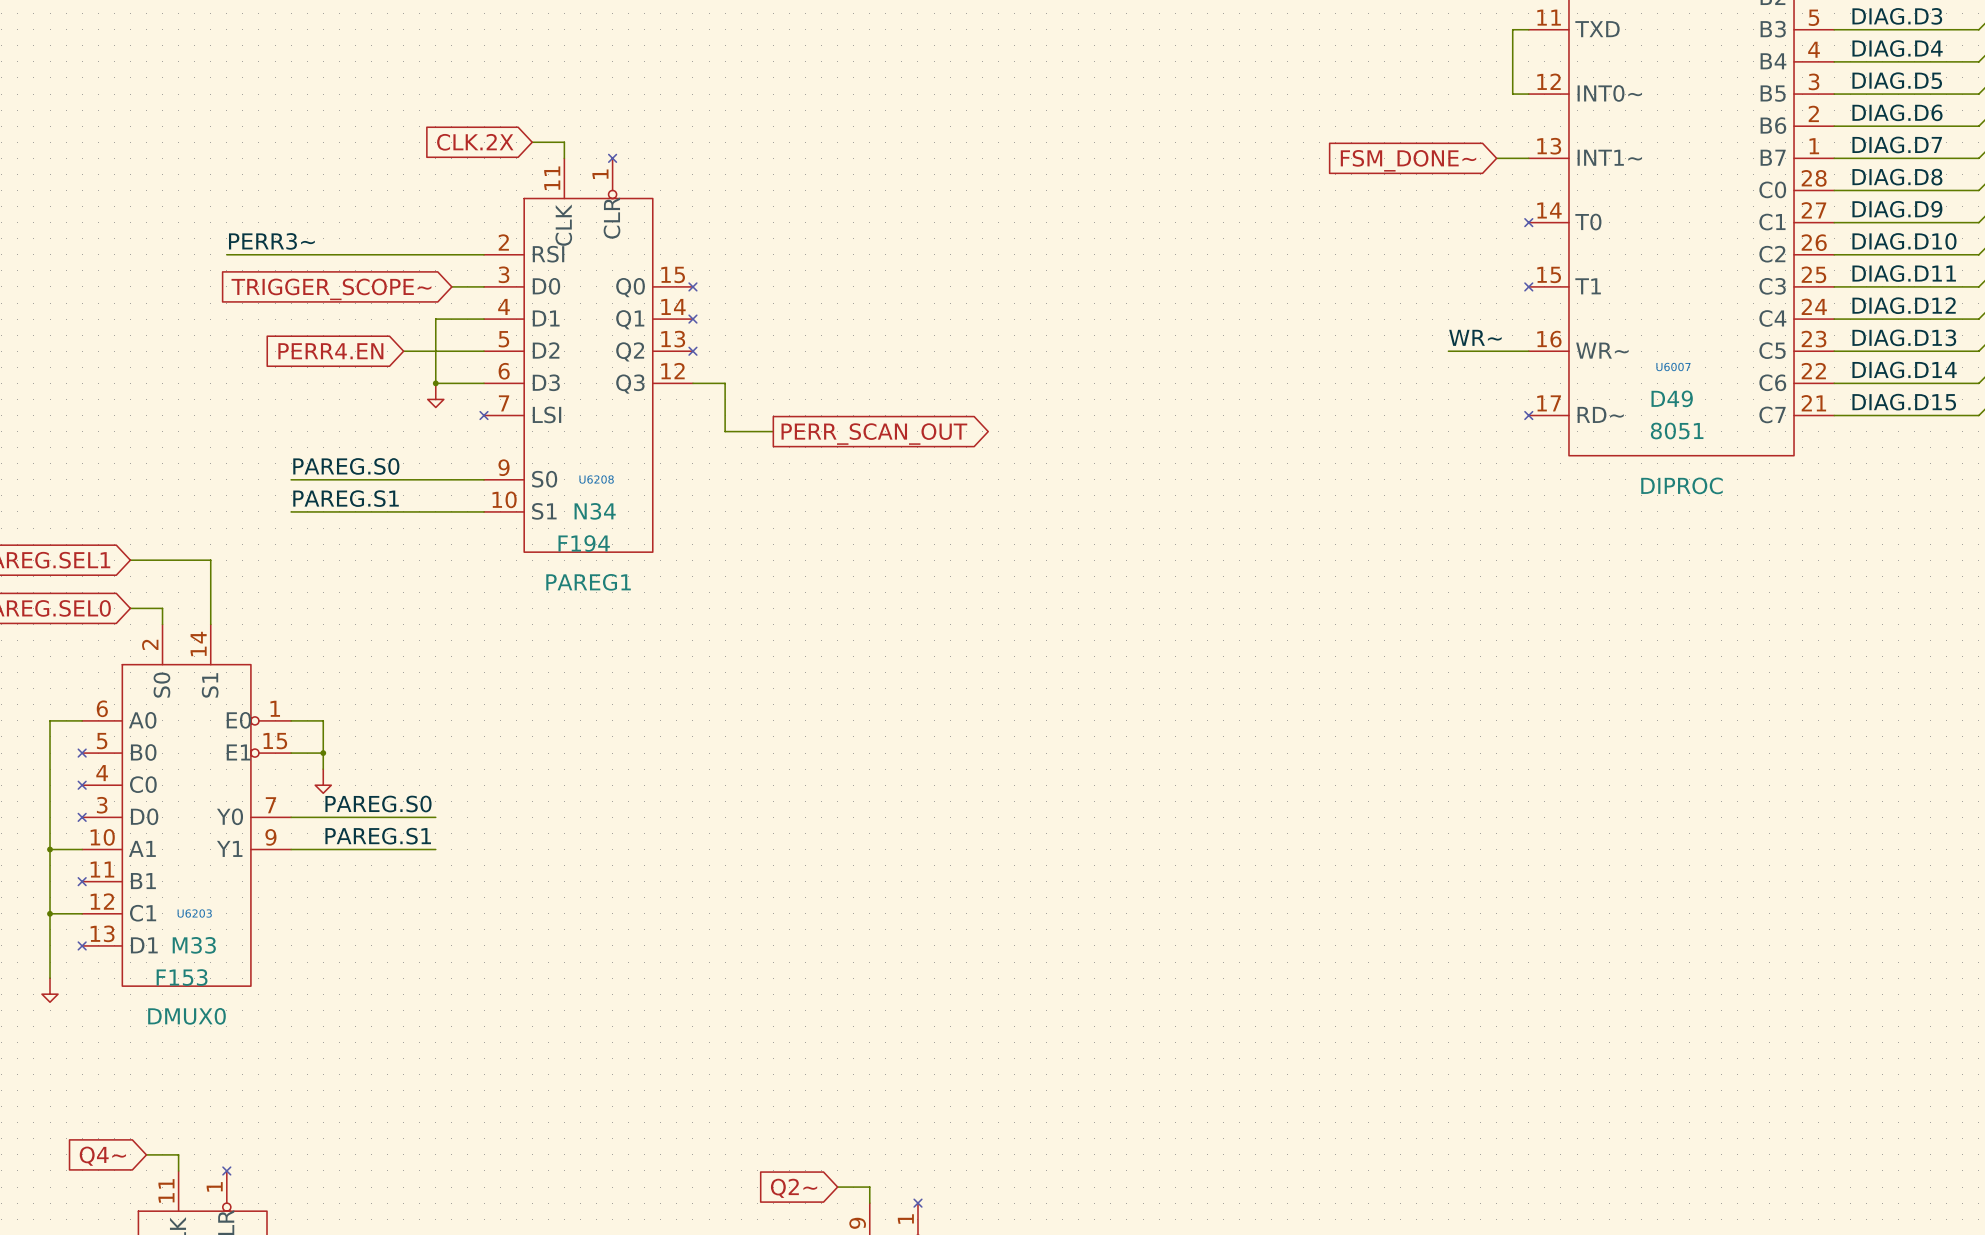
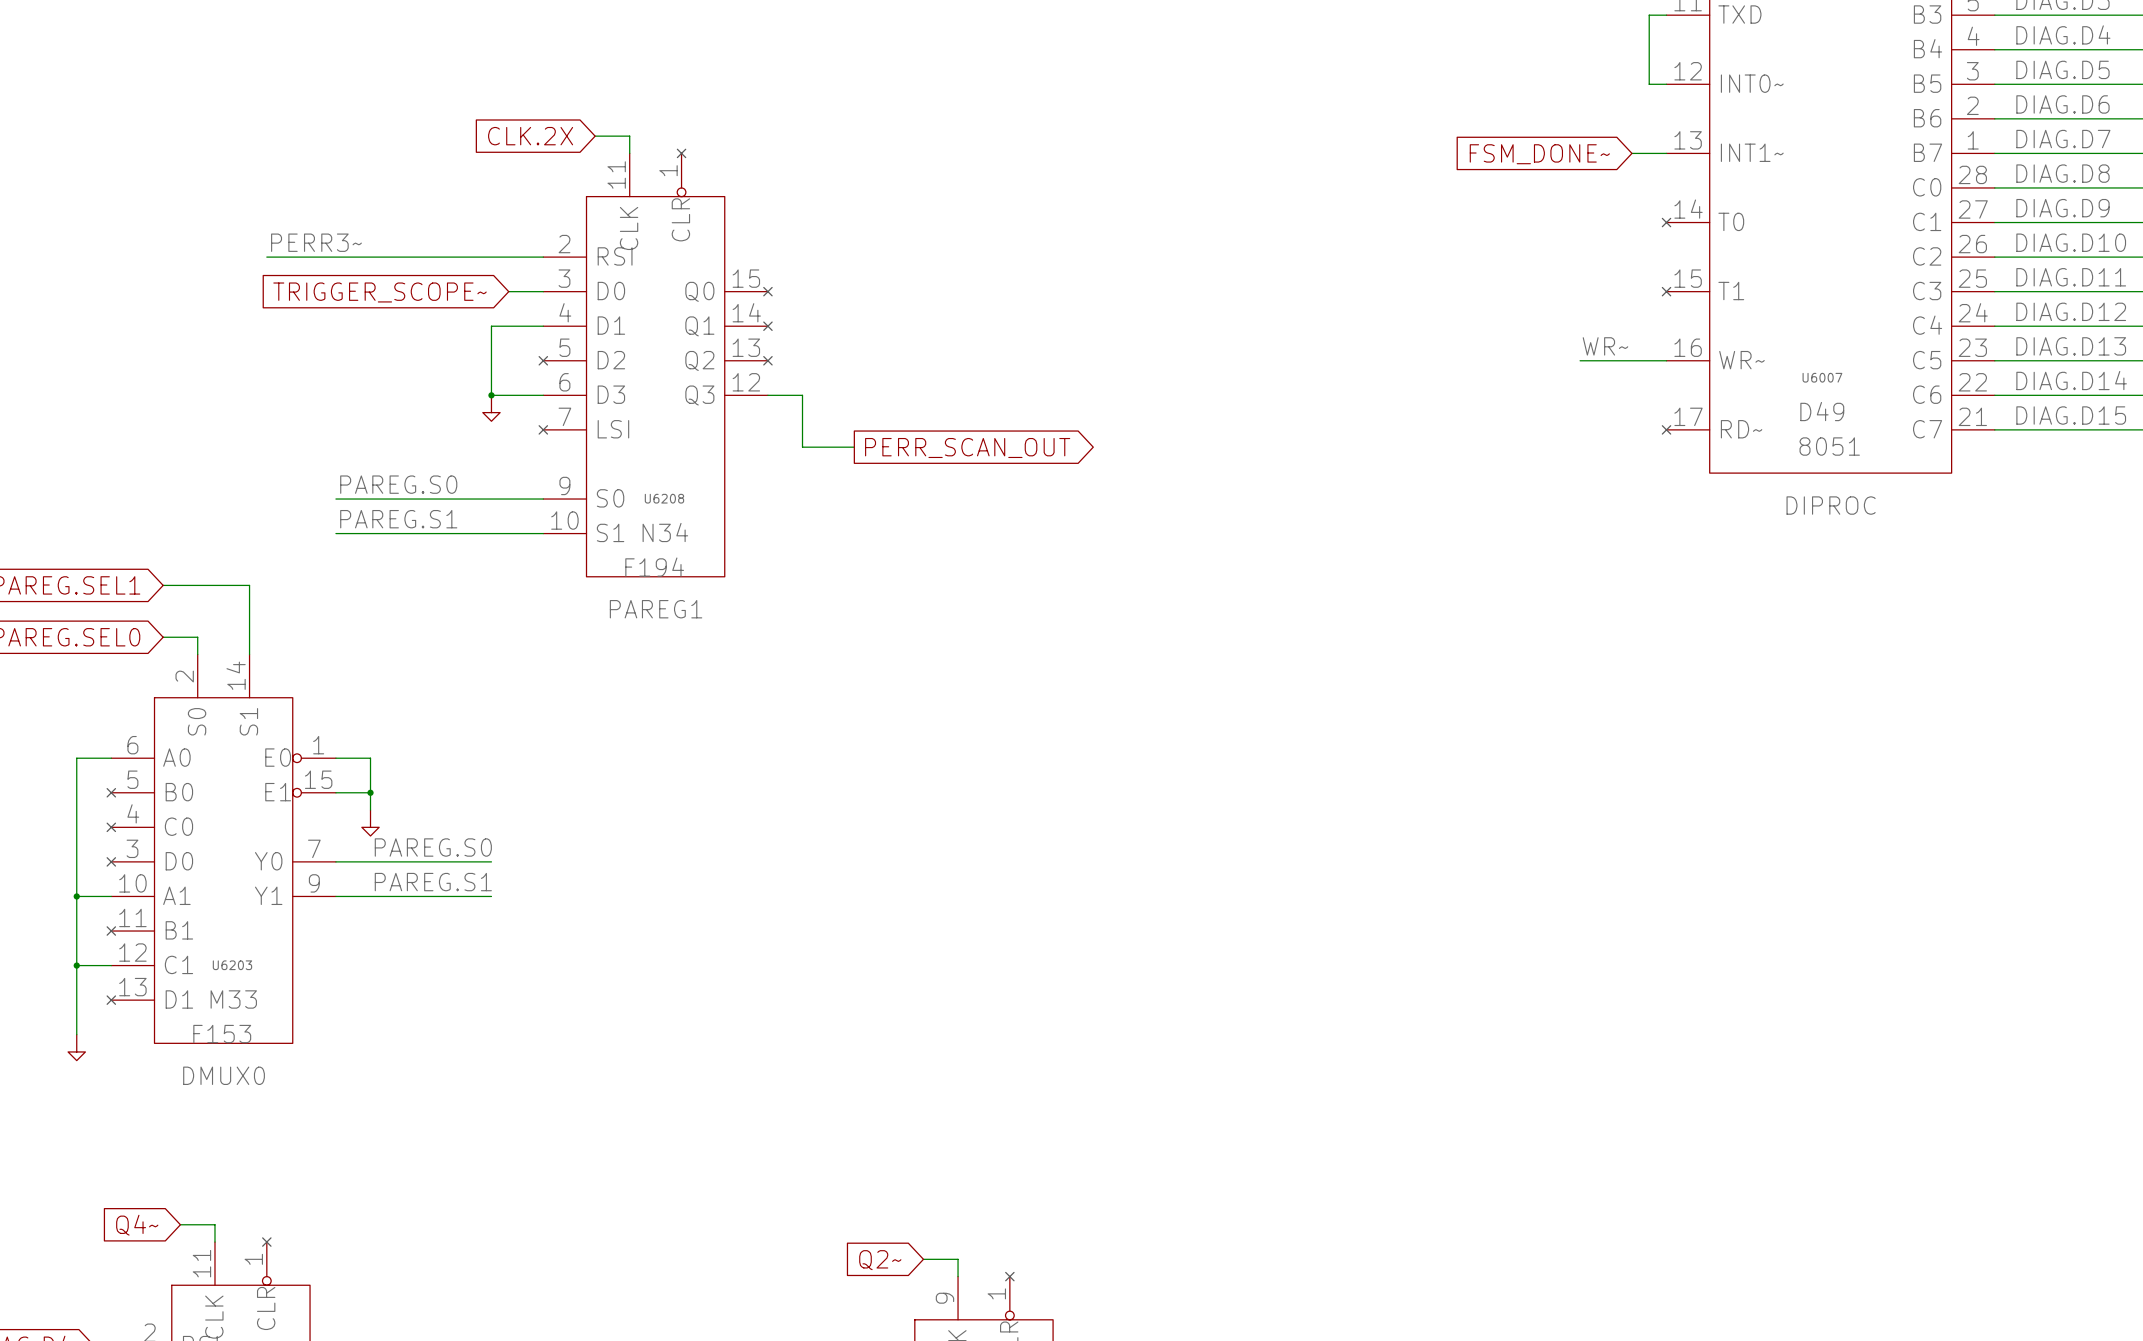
global label: PERR4.EN (330, 351) -> none
wire: (403, 351) (484, 351) -> none
no-connect mark: none -> (543, 360)

